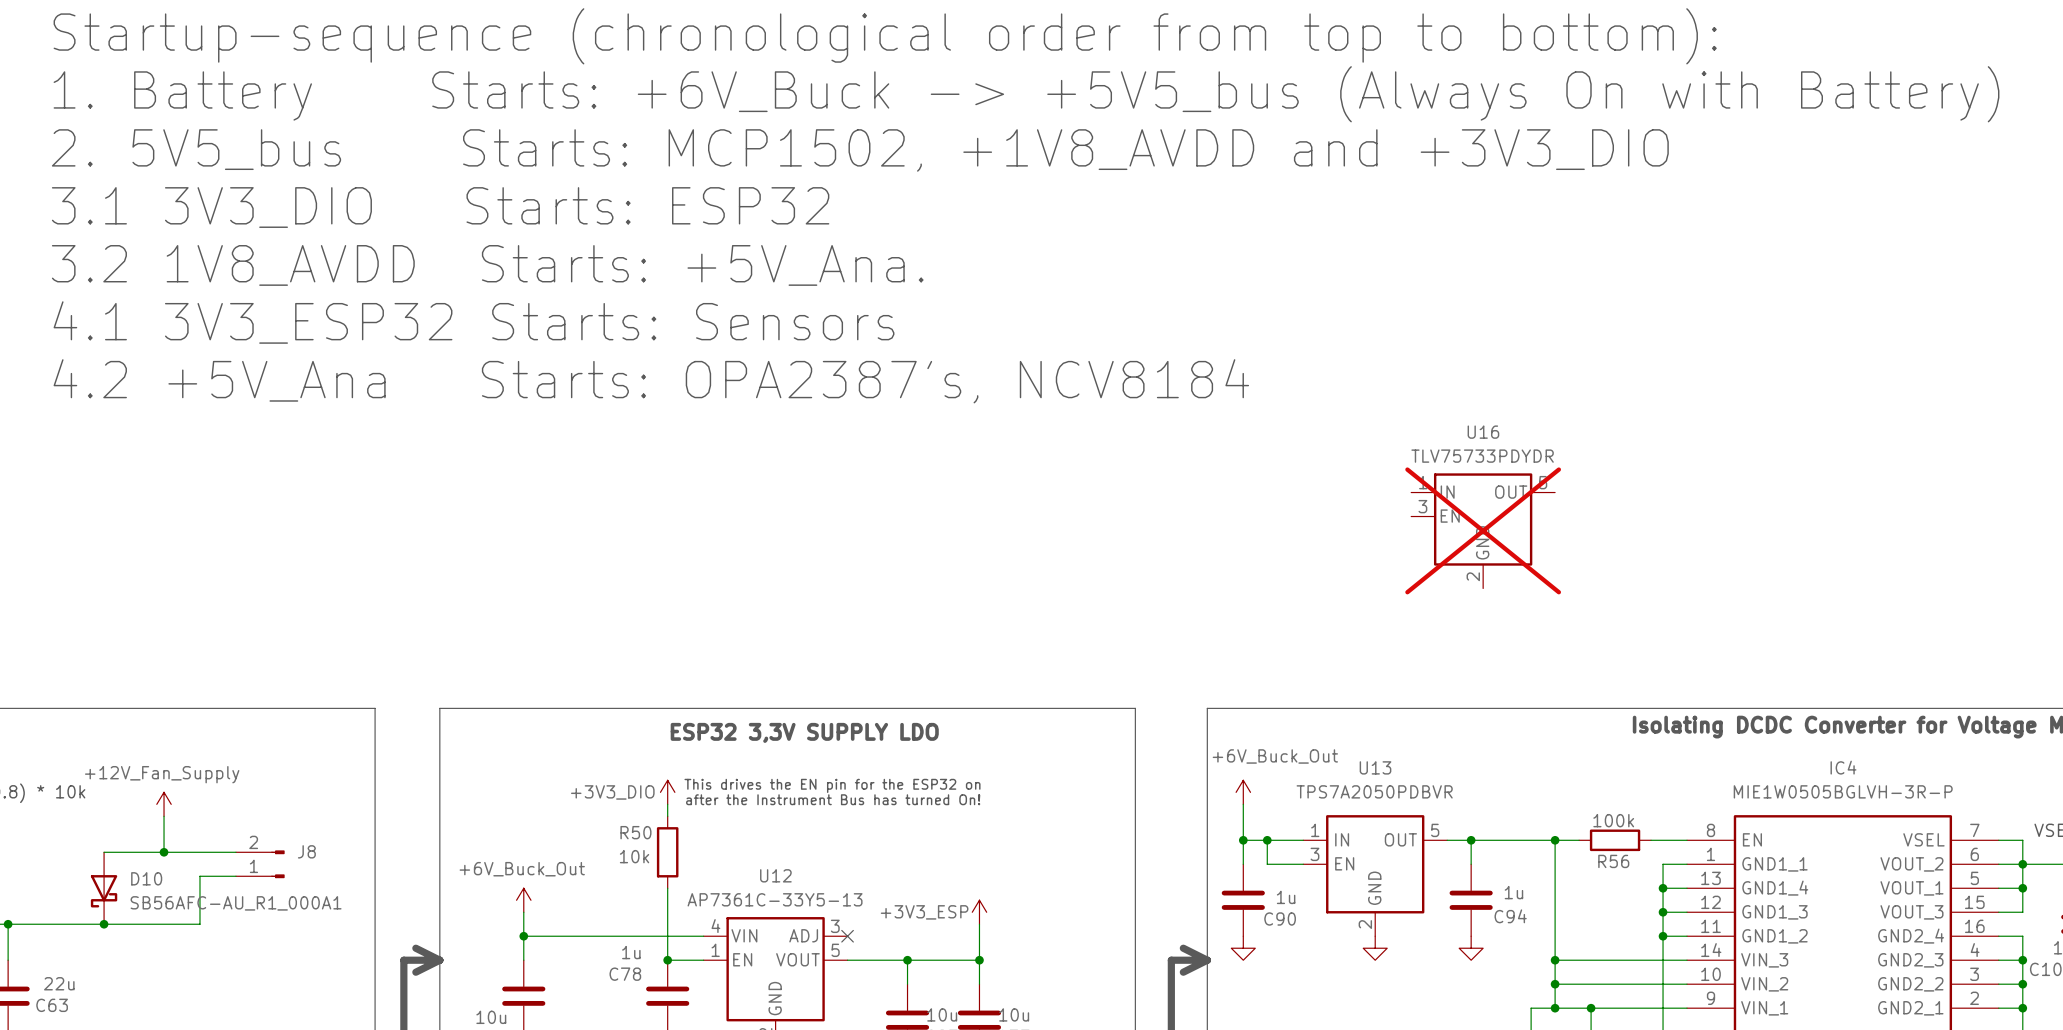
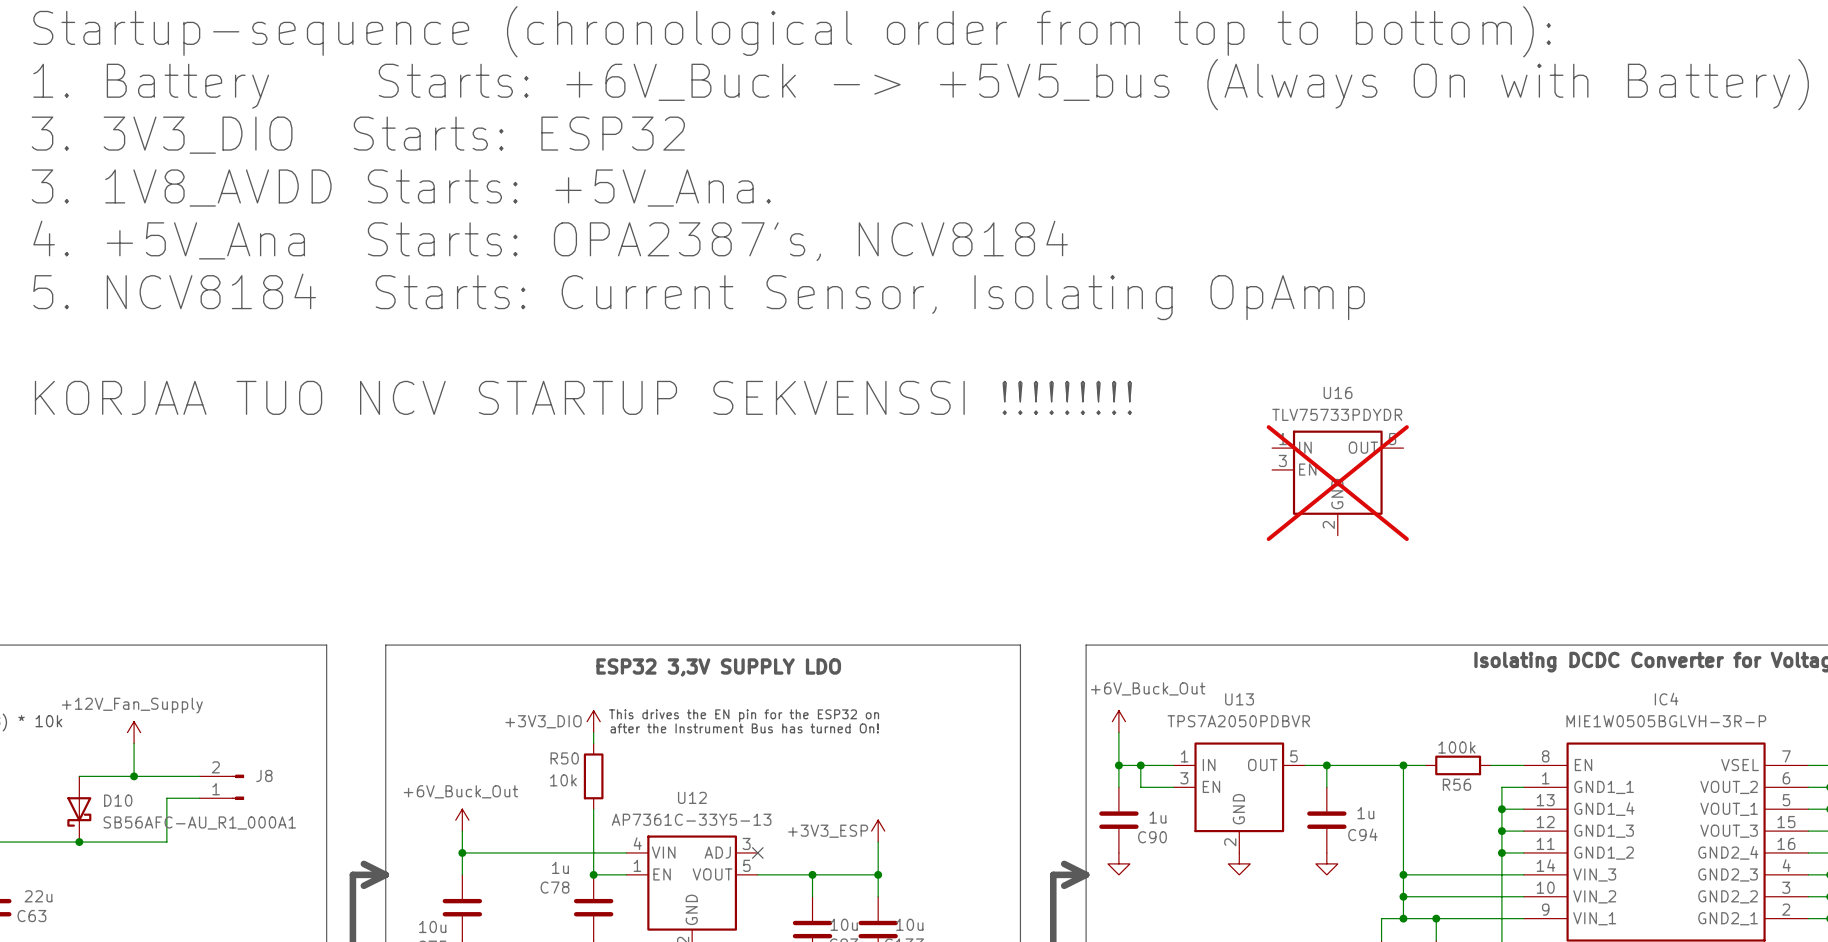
text: 2. 5V5_bus Starts: MCP1502, +1V8_AVDD and +3V3_DIO (860, 150) -> 3. 3V3_DIO Starts: ESP32 (358, 135)
text: 3.1 3V3_DIO Starts: ESP32 (440, 207) -> 3. 1V8_AVDD Starts: +5V_Ana. (401, 188)
text: 3.2 1V8_AVDD Starts: +5V_Ana. (487, 265) -> 4. +5V_Ana Starts: OPA2387's, NCV8184 (550, 240)
text: 4.1 3V3_ESP32 Starts: Sensors (474, 322) -> 5. NCV8184 Starts: Current Sensor, Isolating OpAmp (699, 296)
text: 4.2 +5V_Ana Starts: OPA2387's, NCV8184 (651, 381) -> none
text: none -> KORJAA TUO NCV STARTUP SEKVENSSI !!!!!!!!! (583, 397)

